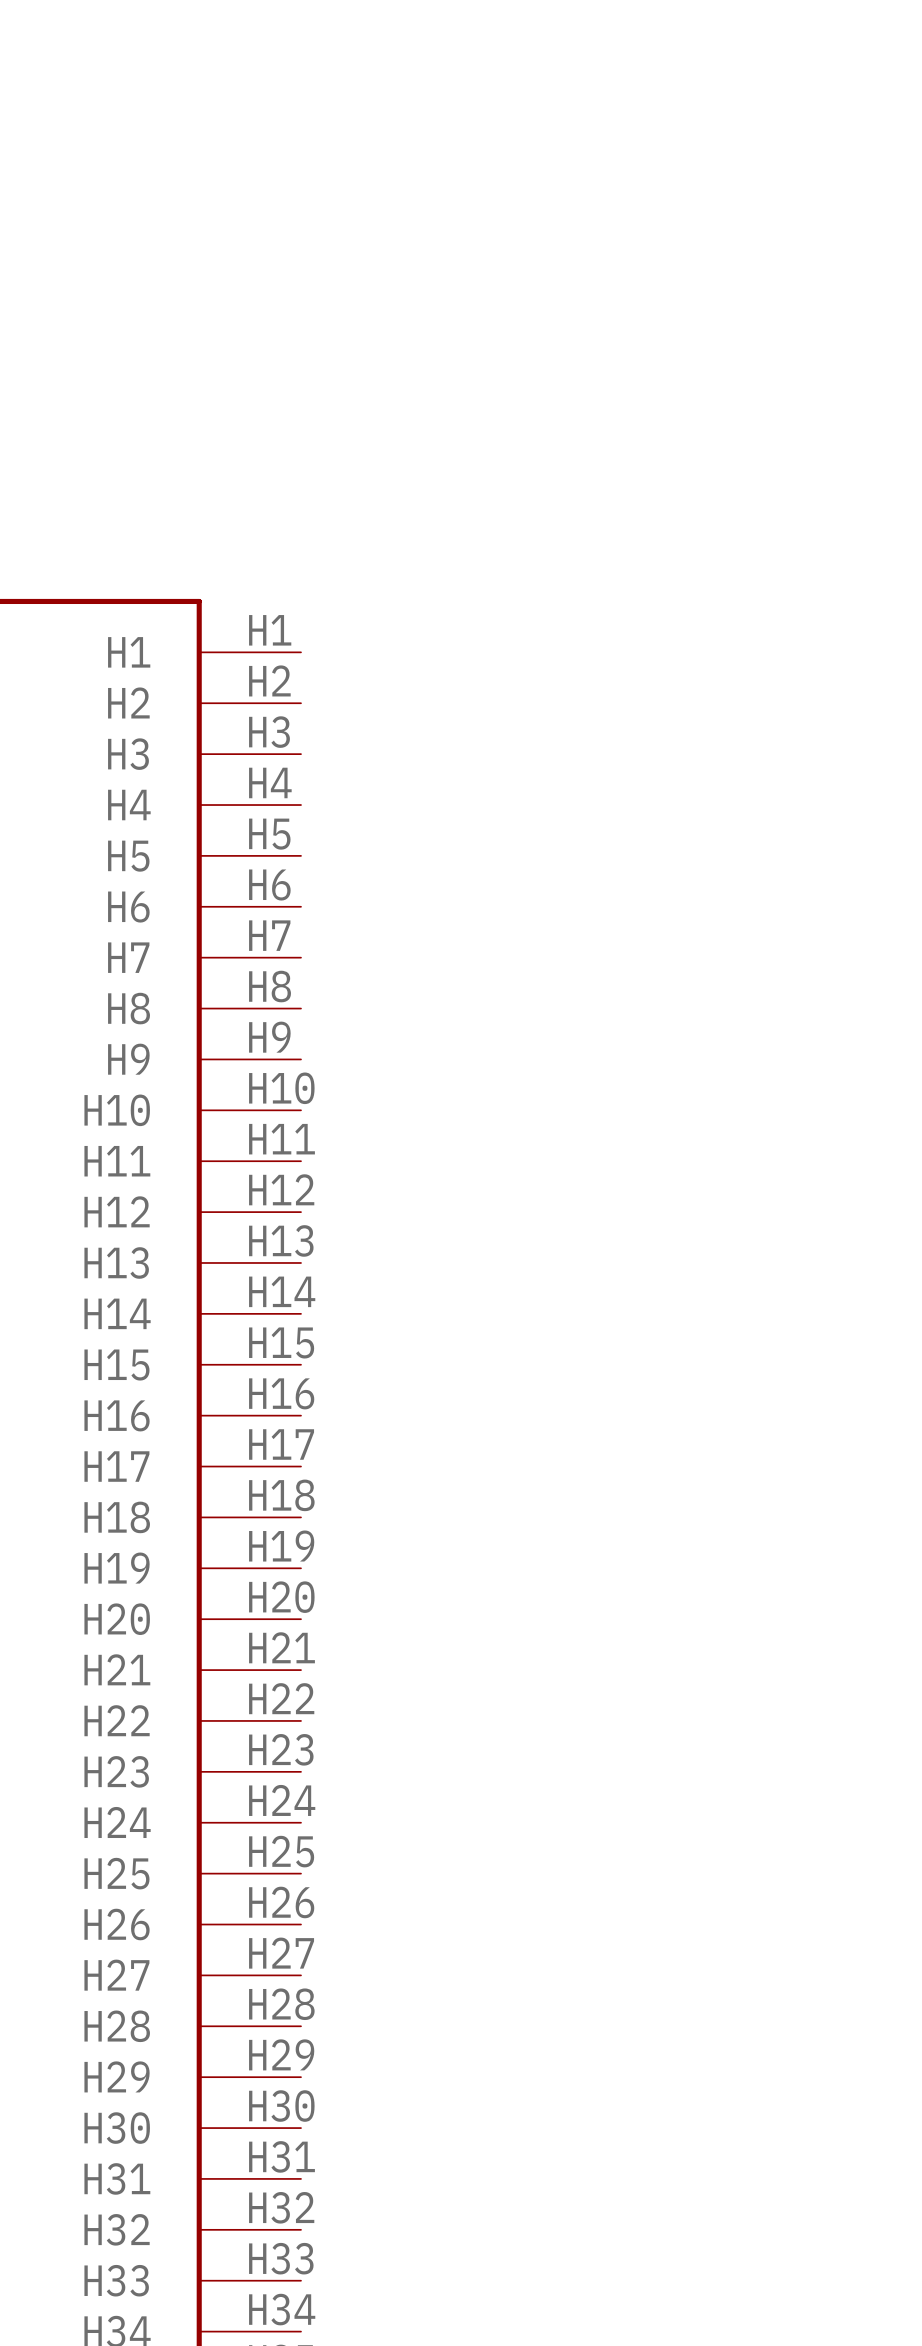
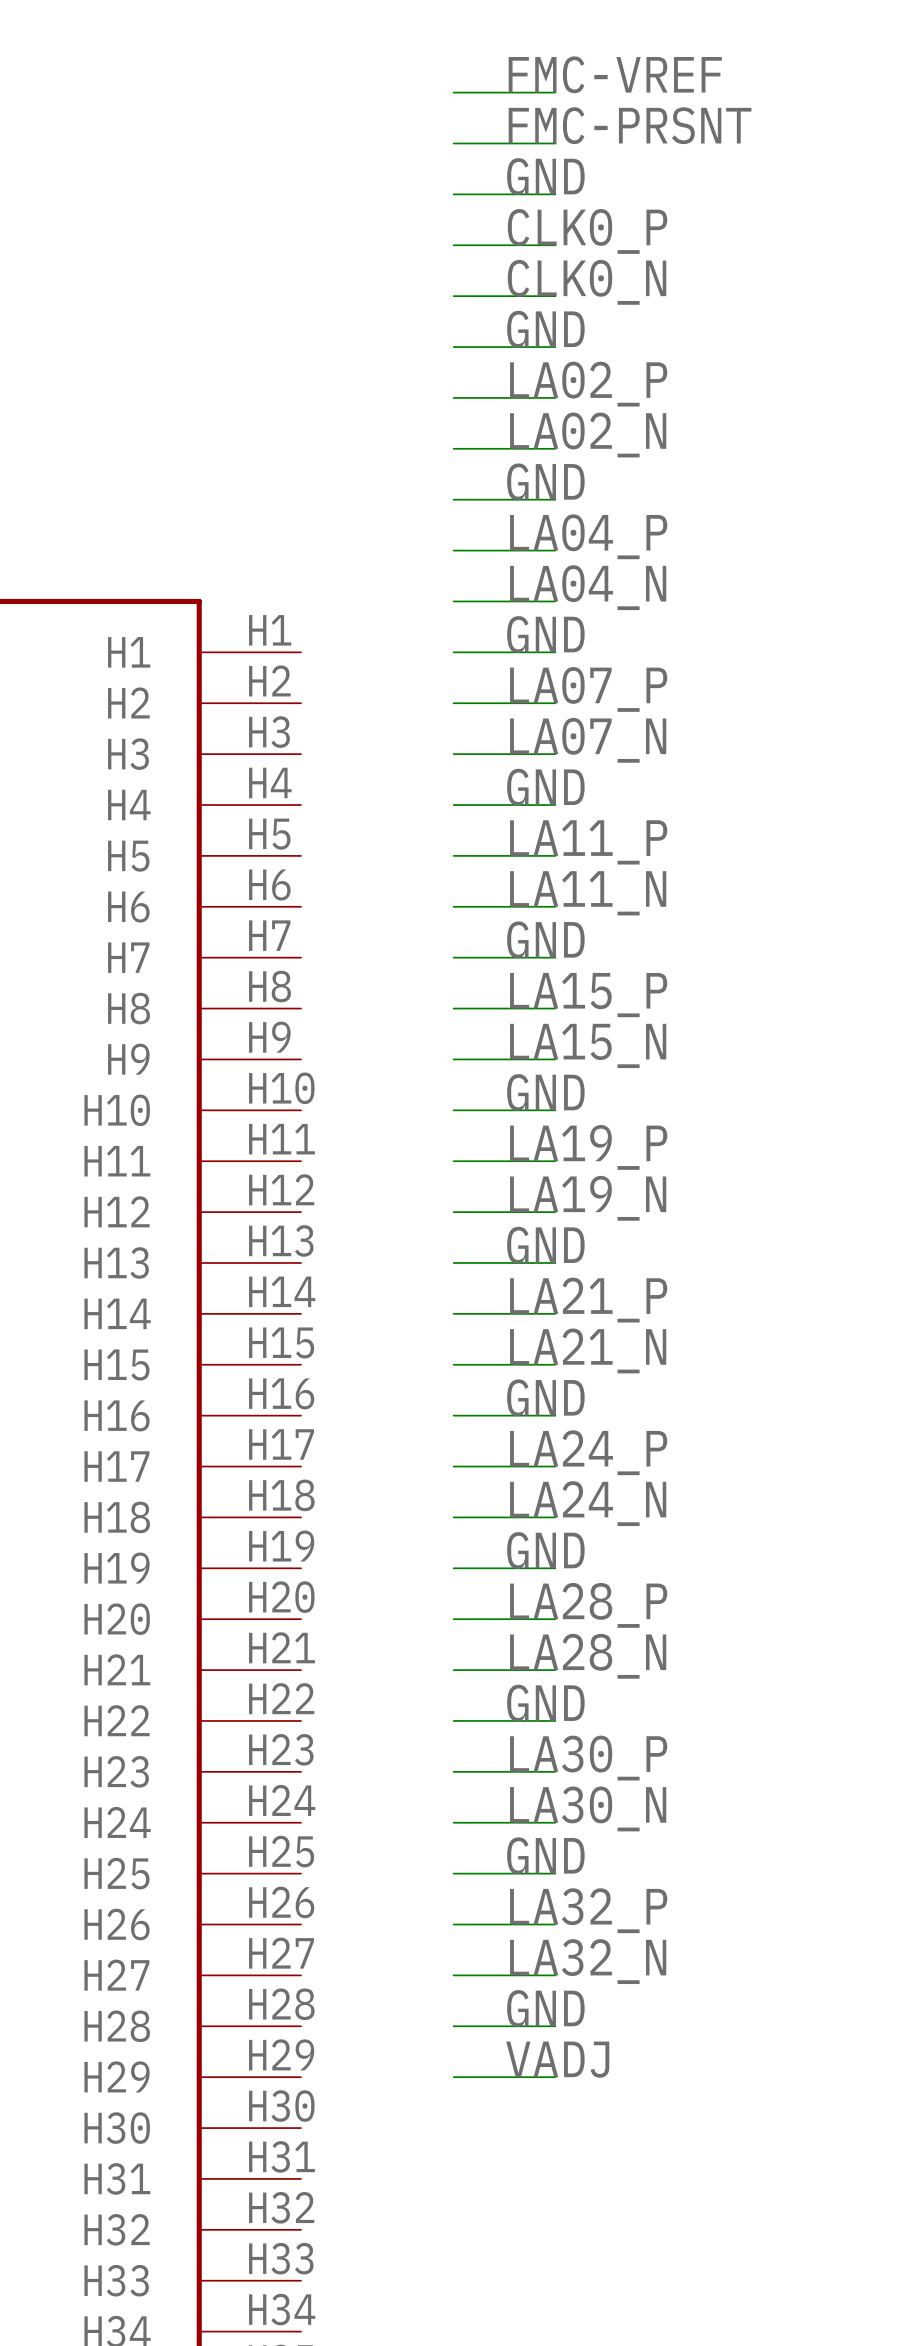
label: none -> FMC-VREF (615, 74)
wire: none -> (453, 92) (555, 92)
label: none -> FMC-PRSNT (630, 125)
wire: none -> (453, 143) (555, 143)
label: none -> GND (545, 176)
wire: none -> (453, 194) (555, 194)
label: none -> CLK0_P (587, 231)
wire: none -> (453, 245) (555, 245)
label: none -> CLK0_N (586, 282)
wire: none -> (453, 296) (555, 296)
label: none -> GND (545, 329)
wire: none -> (453, 347) (555, 347)
label: none -> LA02_P (588, 384)
wire: none -> (453, 397) (555, 397)
label: none -> LA02_N (588, 435)
wire: none -> (453, 448) (555, 448)
label: none -> GND (545, 481)
wire: none -> (453, 499) (555, 499)
label: none -> LA04_P (588, 536)
wire: none -> (453, 550) (555, 550)
label: none -> LA04_N (588, 587)
wire: none -> (453, 601) (555, 601)
label: none -> GND (545, 634)
wire: none -> (453, 652) (555, 652)
label: none -> LA07_P (588, 689)
wire: none -> (453, 703) (555, 703)
label: none -> LA07_N (588, 740)
wire: none -> (453, 754) (555, 754)
label: none -> GND (545, 787)
wire: none -> (453, 805) (555, 805)
label: none -> LA11_P (588, 842)
wire: none -> (453, 855) (555, 855)
label: none -> LA11_N (588, 893)
wire: none -> (453, 906) (555, 906)
label: none -> GND (545, 939)
wire: none -> (453, 957) (555, 957)
label: none -> LA15_P (588, 995)
wire: none -> (453, 1008) (555, 1008)
label: none -> LA15_N (588, 1045)
wire: none -> (453, 1059) (555, 1059)
label: none -> GND (545, 1092)
wire: none -> (453, 1110) (555, 1110)
label: none -> LA19_P (588, 1147)
wire: none -> (453, 1161) (555, 1161)
label: none -> LA19_N (588, 1198)
wire: none -> (453, 1212) (555, 1212)
label: none -> GND (545, 1245)
wire: none -> (453, 1262) (555, 1262)
label: none -> LA21_P (588, 1300)
wire: none -> (453, 1313) (555, 1313)
label: none -> LA21_N (588, 1350)
wire: none -> (453, 1364) (555, 1364)
label: none -> GND (545, 1397)
wire: none -> (453, 1415) (555, 1415)
label: none -> LA24_P (588, 1452)
wire: none -> (453, 1466) (555, 1466)
label: none -> LA24_N (588, 1503)
wire: none -> (453, 1517) (555, 1517)
label: none -> GND (545, 1550)
wire: none -> (453, 1568) (555, 1568)
label: none -> LA28_P (588, 1605)
wire: none -> (453, 1619) (555, 1619)
label: none -> LA28_N (588, 1656)
wire: none -> (453, 1670) (555, 1670)
label: none -> GND (545, 1703)
wire: none -> (453, 1720) (555, 1720)
label: none -> LA30_P (588, 1758)
wire: none -> (453, 1771) (555, 1771)
label: none -> LA30_N (588, 1808)
wire: none -> (453, 1822) (555, 1822)
label: none -> GND (545, 1855)
wire: none -> (453, 1873) (555, 1873)
label: none -> LA32_P (588, 1910)
wire: none -> (453, 1924) (555, 1924)
label: none -> LA32_N (588, 1961)
wire: none -> (453, 1975) (555, 1975)
label: none -> GND (545, 2008)
wire: none -> (453, 2026) (555, 2026)
label: none -> VADJ (557, 2059)
wire: none -> (453, 2077) (555, 2077)

